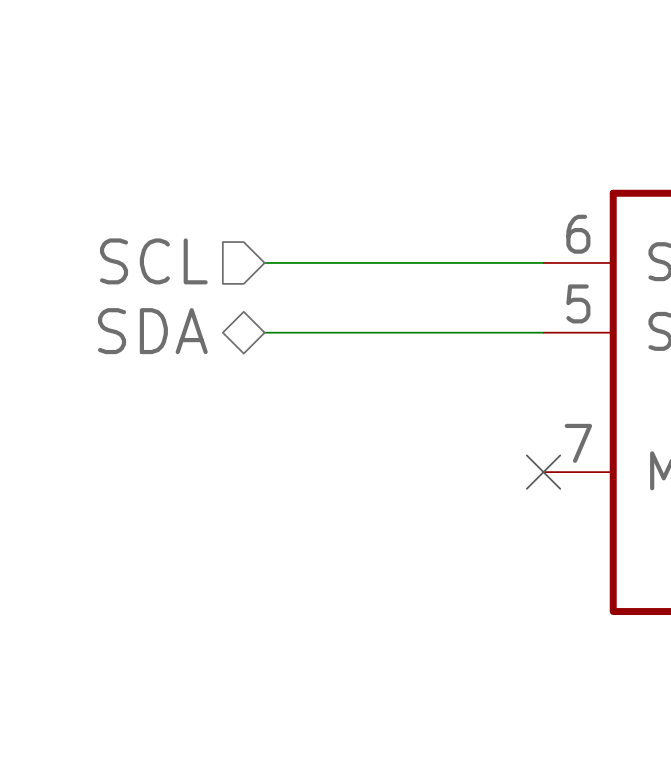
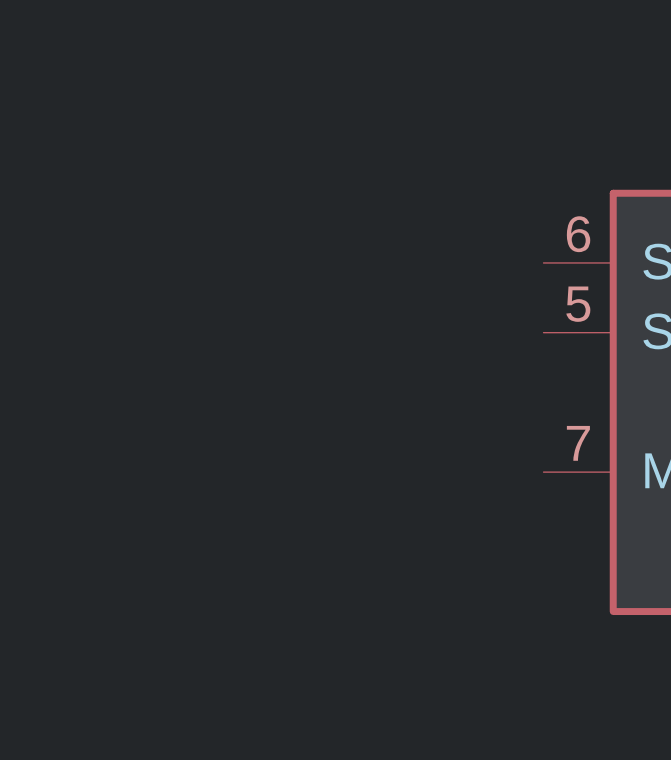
hierarchical label: SCL (153, 261) -> none
wire: (264, 262) (543, 262) -> none
hierarchical label: SDA (152, 331) -> none
wire: (264, 332) (543, 332) -> none
no-connect mark: (543, 472) -> none

